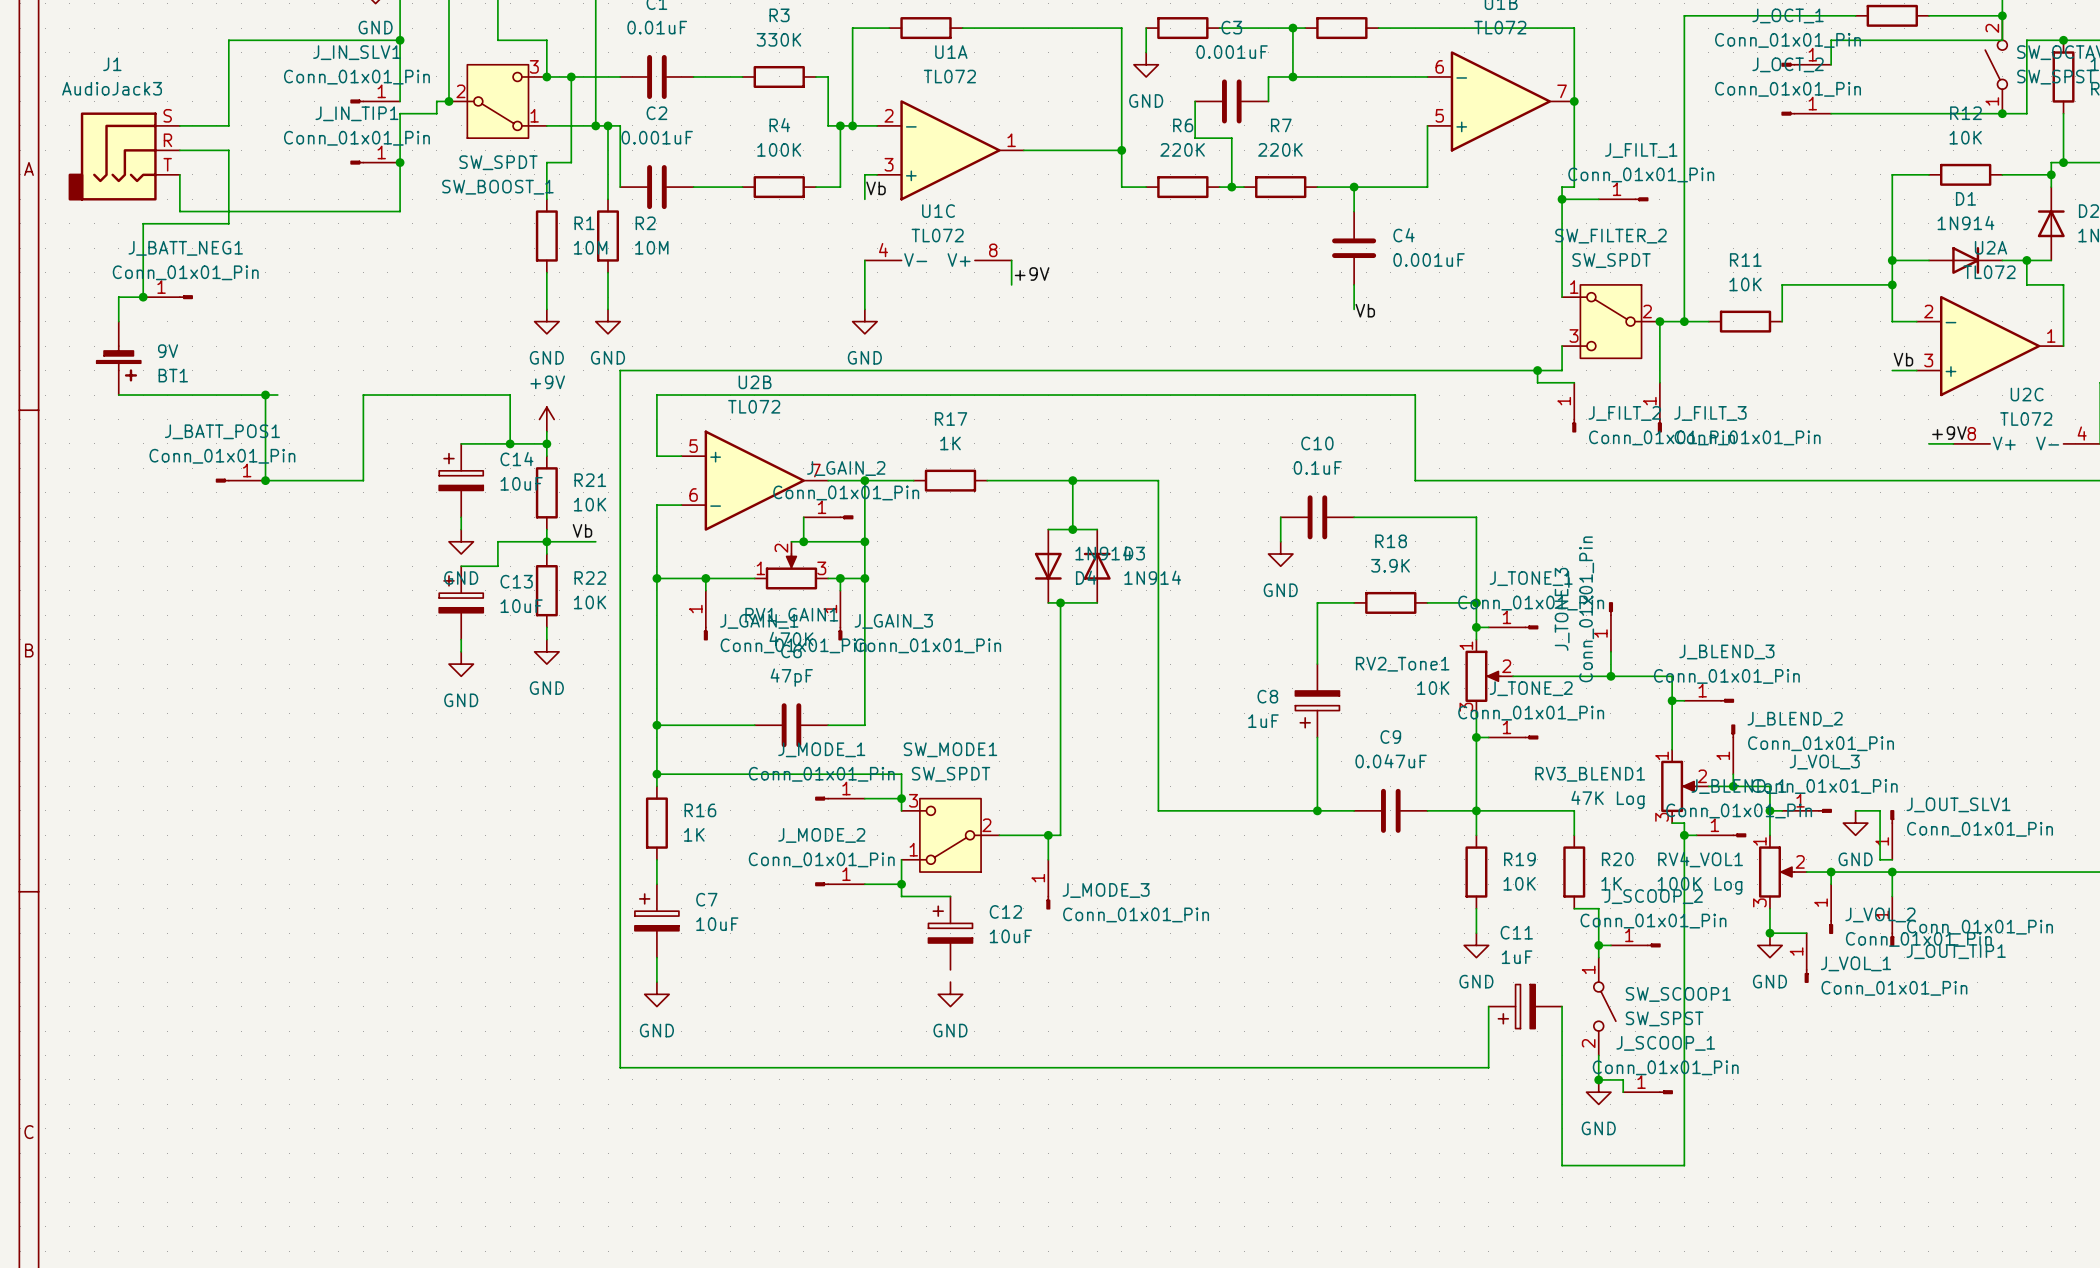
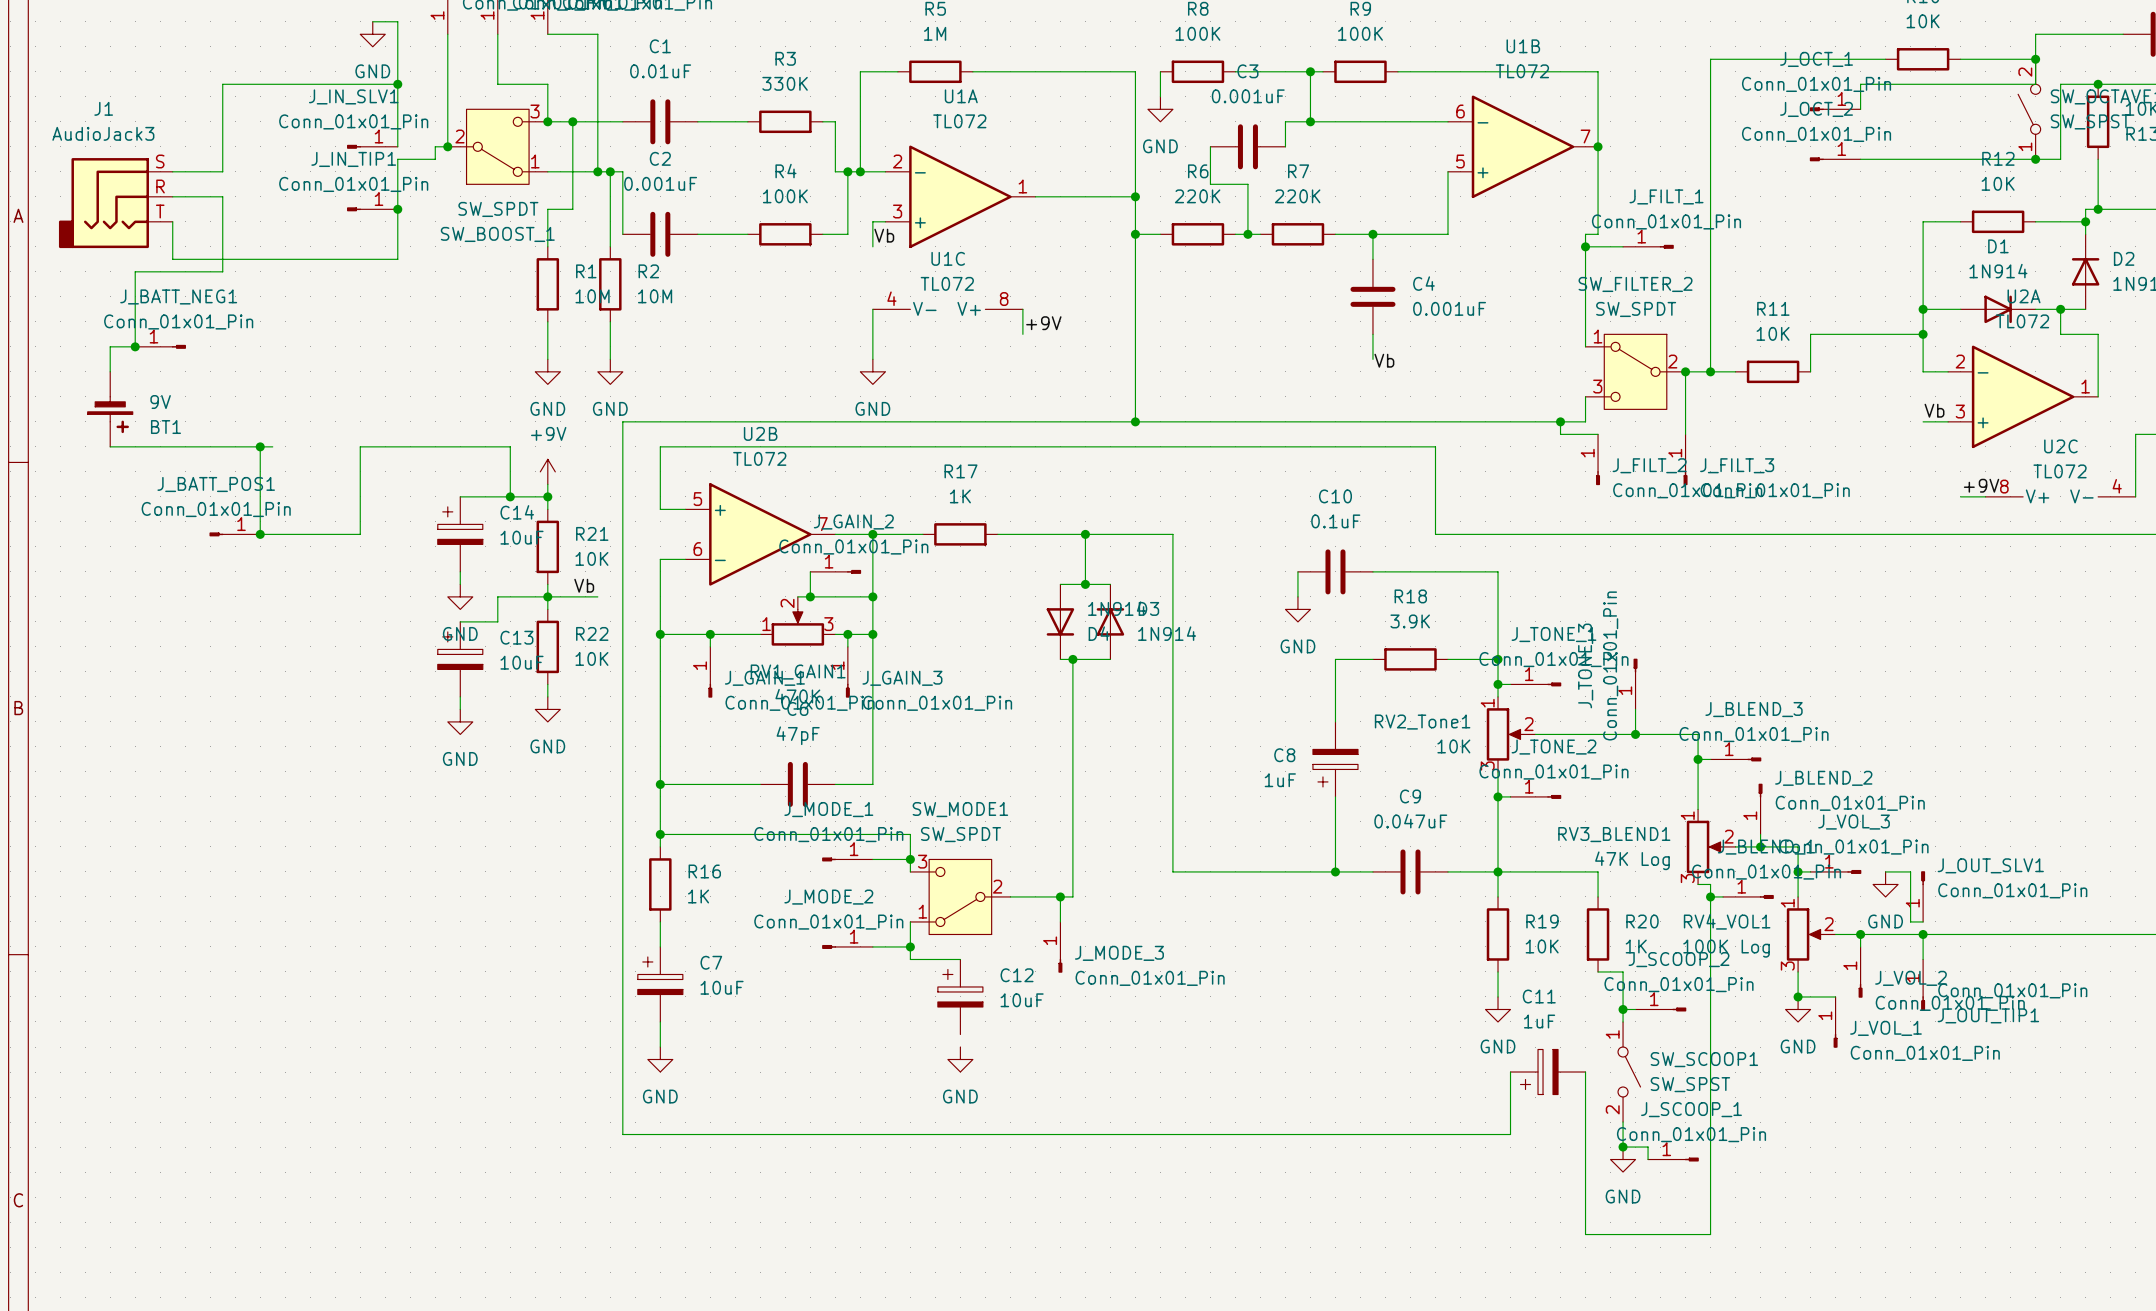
wire: none -> (1135, 234) (1135, 421)
junction: none -> (1135, 234)
junction: none -> (1135, 421)

